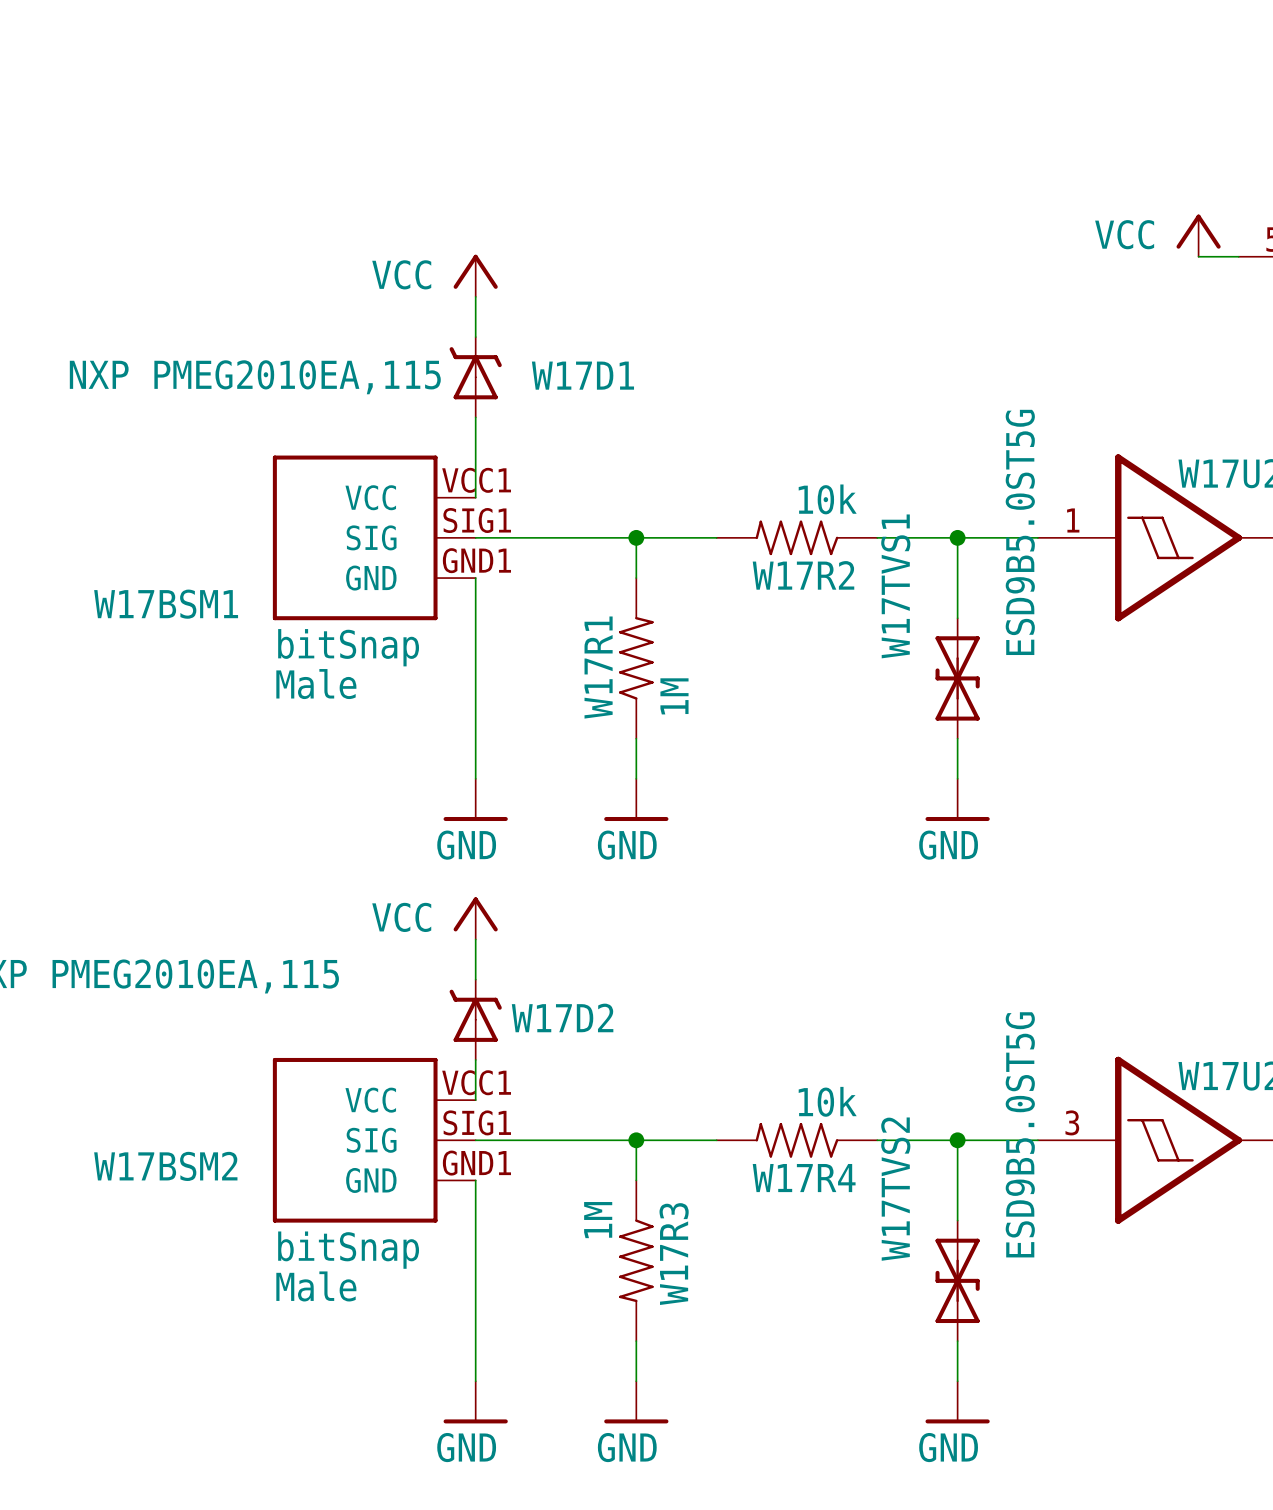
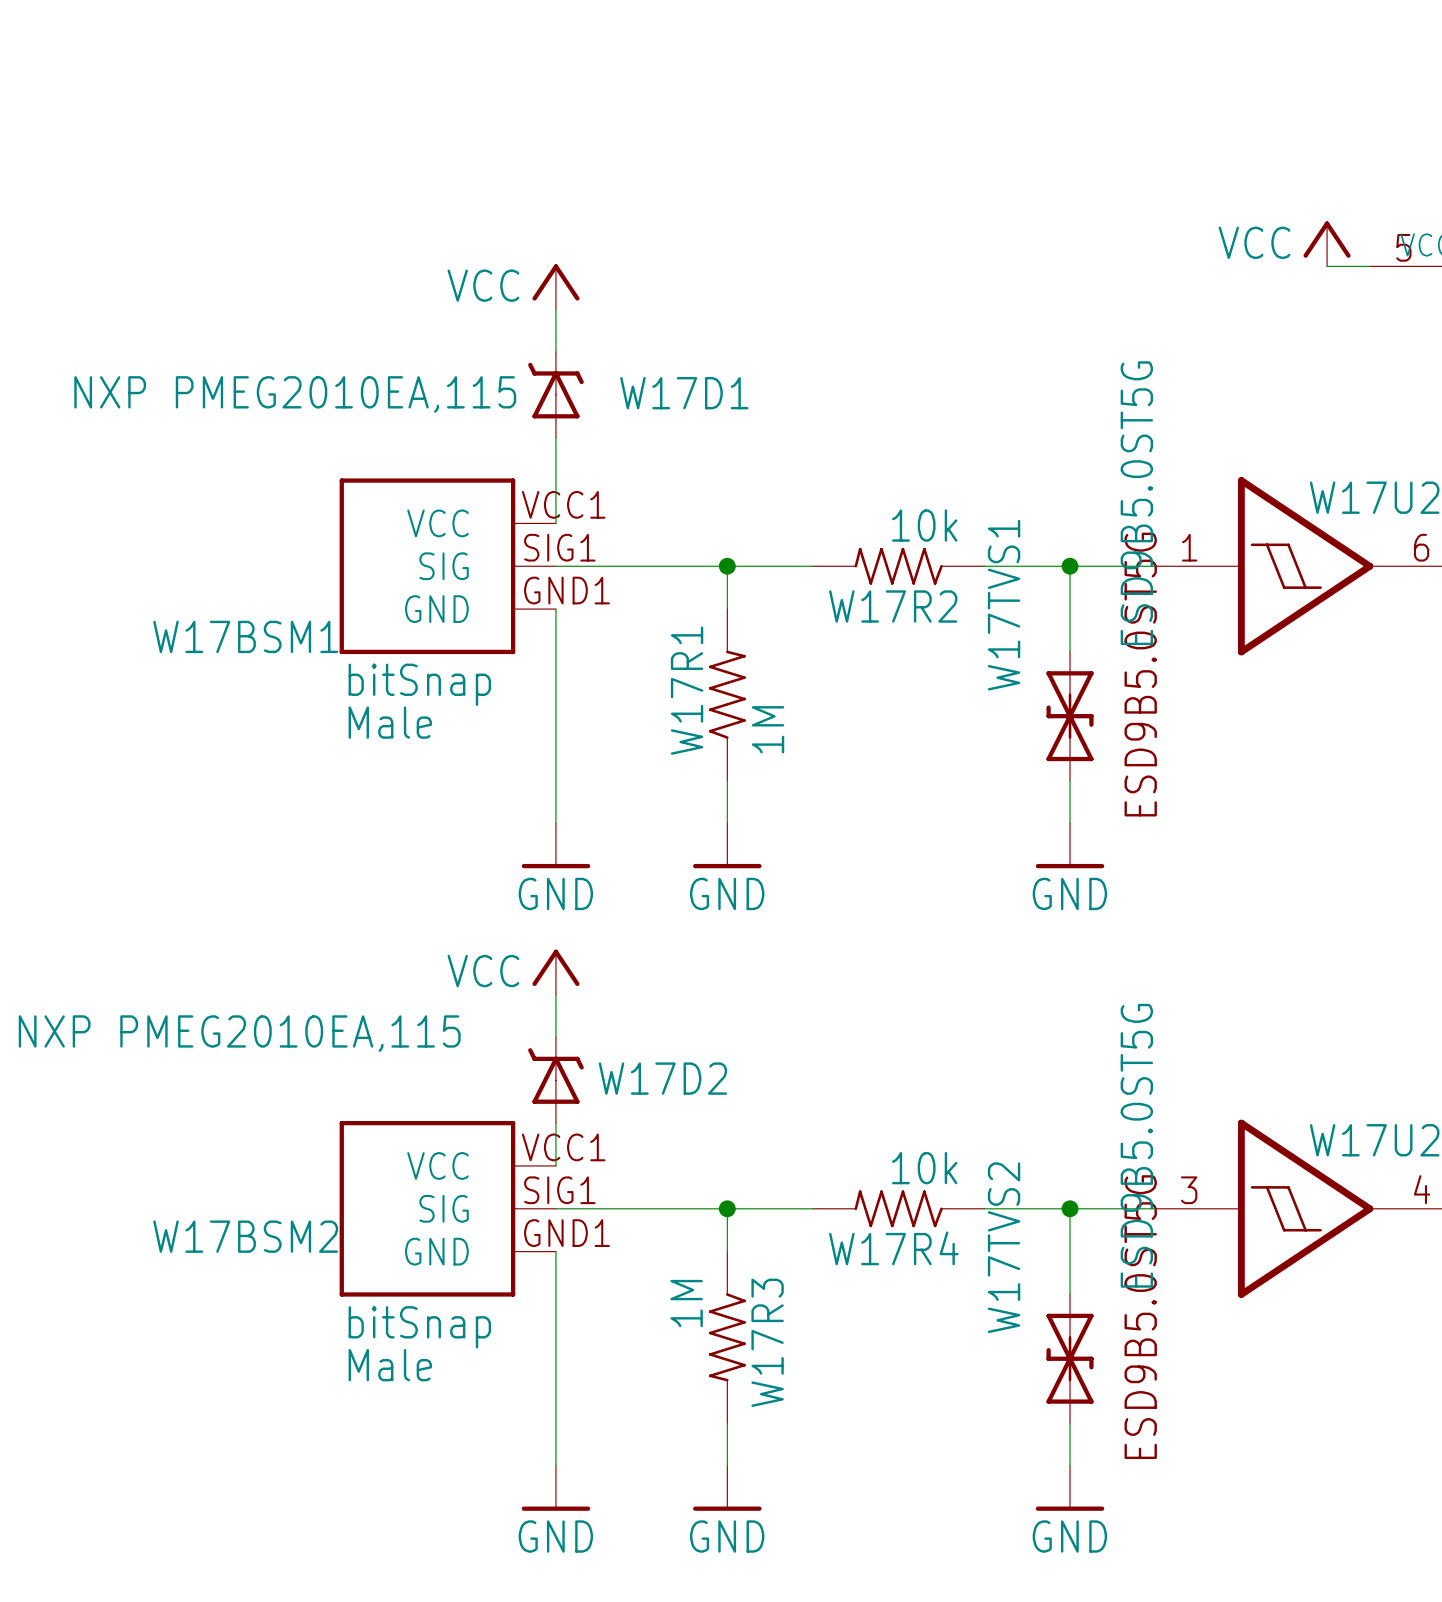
W17TVS1 value position: ESD9B5.0ST5G (1020, 532) -> ESD9B5.0ST5G (1136, 503)
W17TVS1 text: none -> ESD9B5.0ST5G (1140, 674)
W17TVS2 value position: ESD9B5.0ST5G (1020, 1134) -> ESD9B5.0ST5G (1136, 1145)
W17TVS2 text: none -> ESD9B5.0ST5G (1140, 1317)

